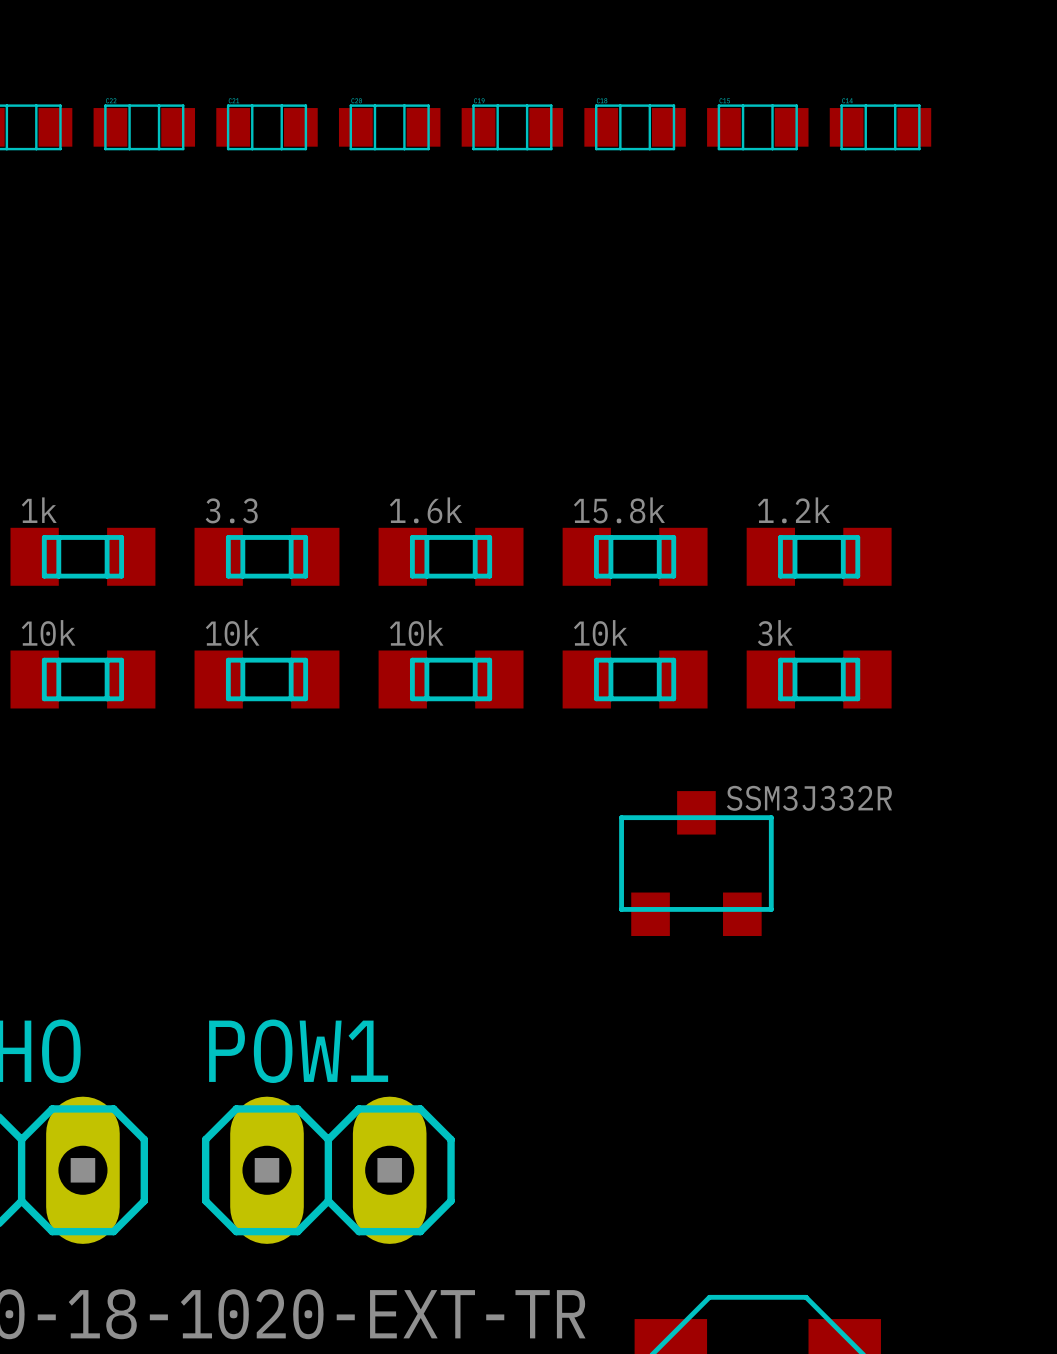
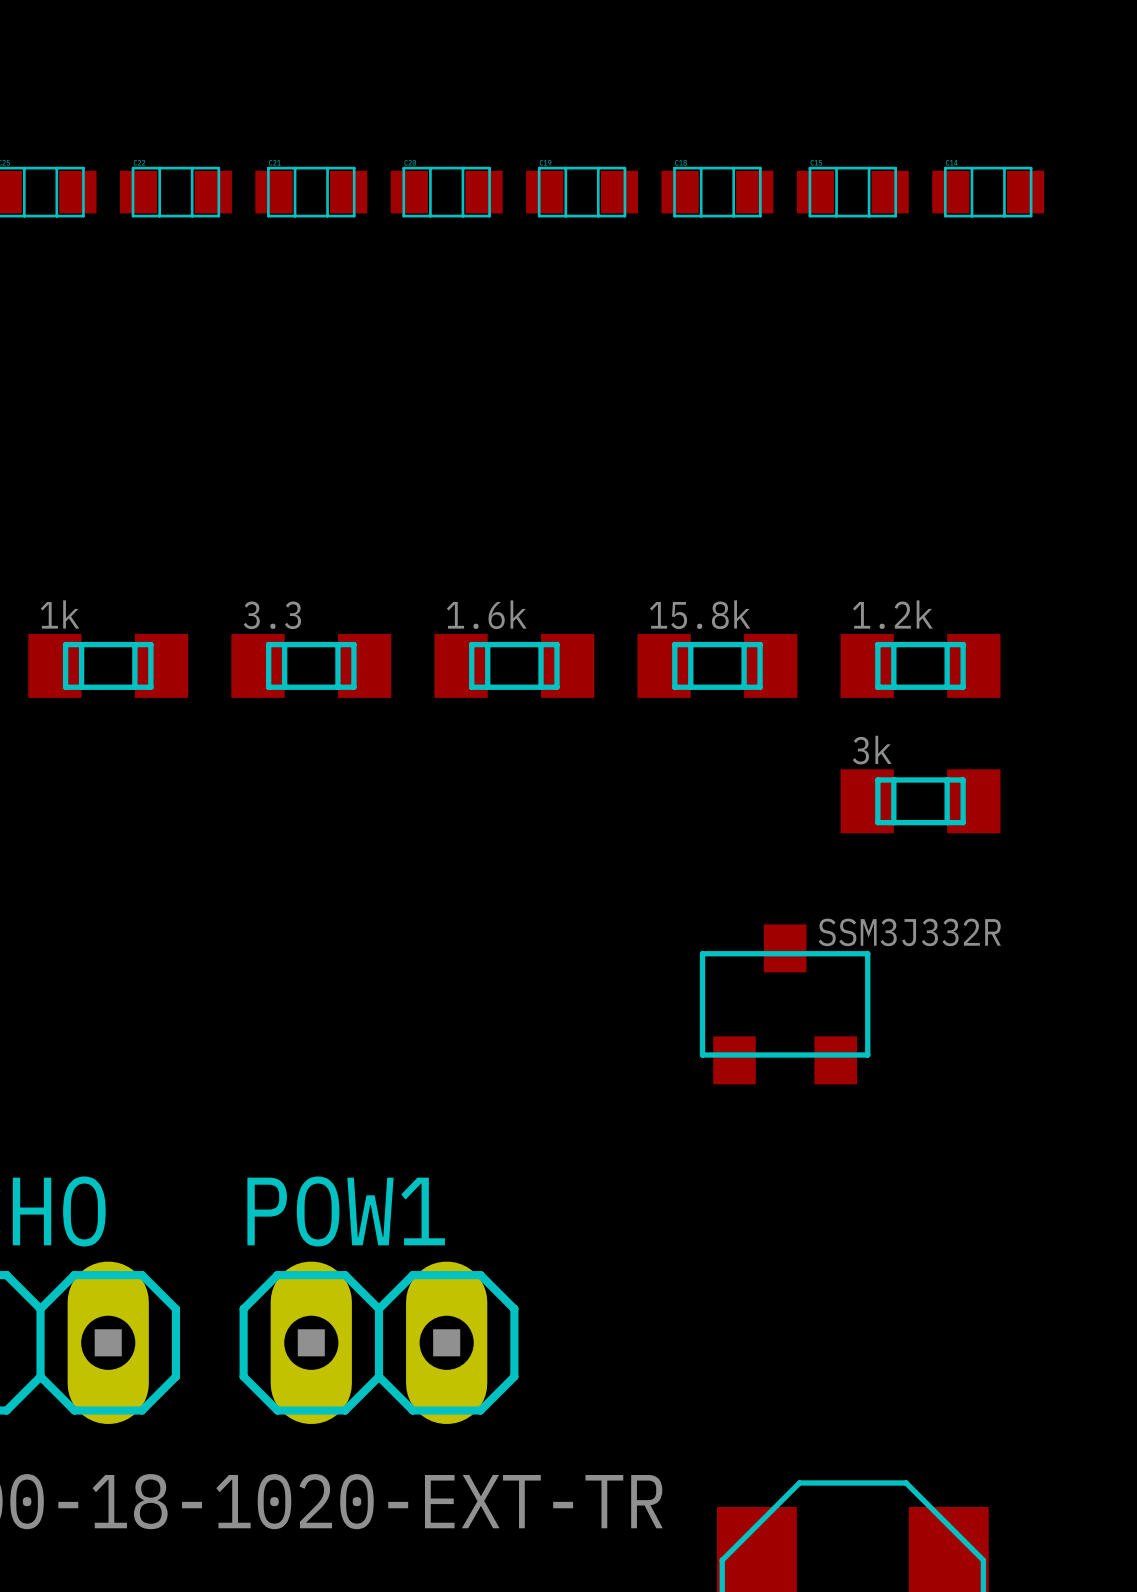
part: 10k (82, 679) -> none
part: 10k (267, 679) -> none
part: 10k (451, 679) -> none
part: 10k (635, 679) -> none

